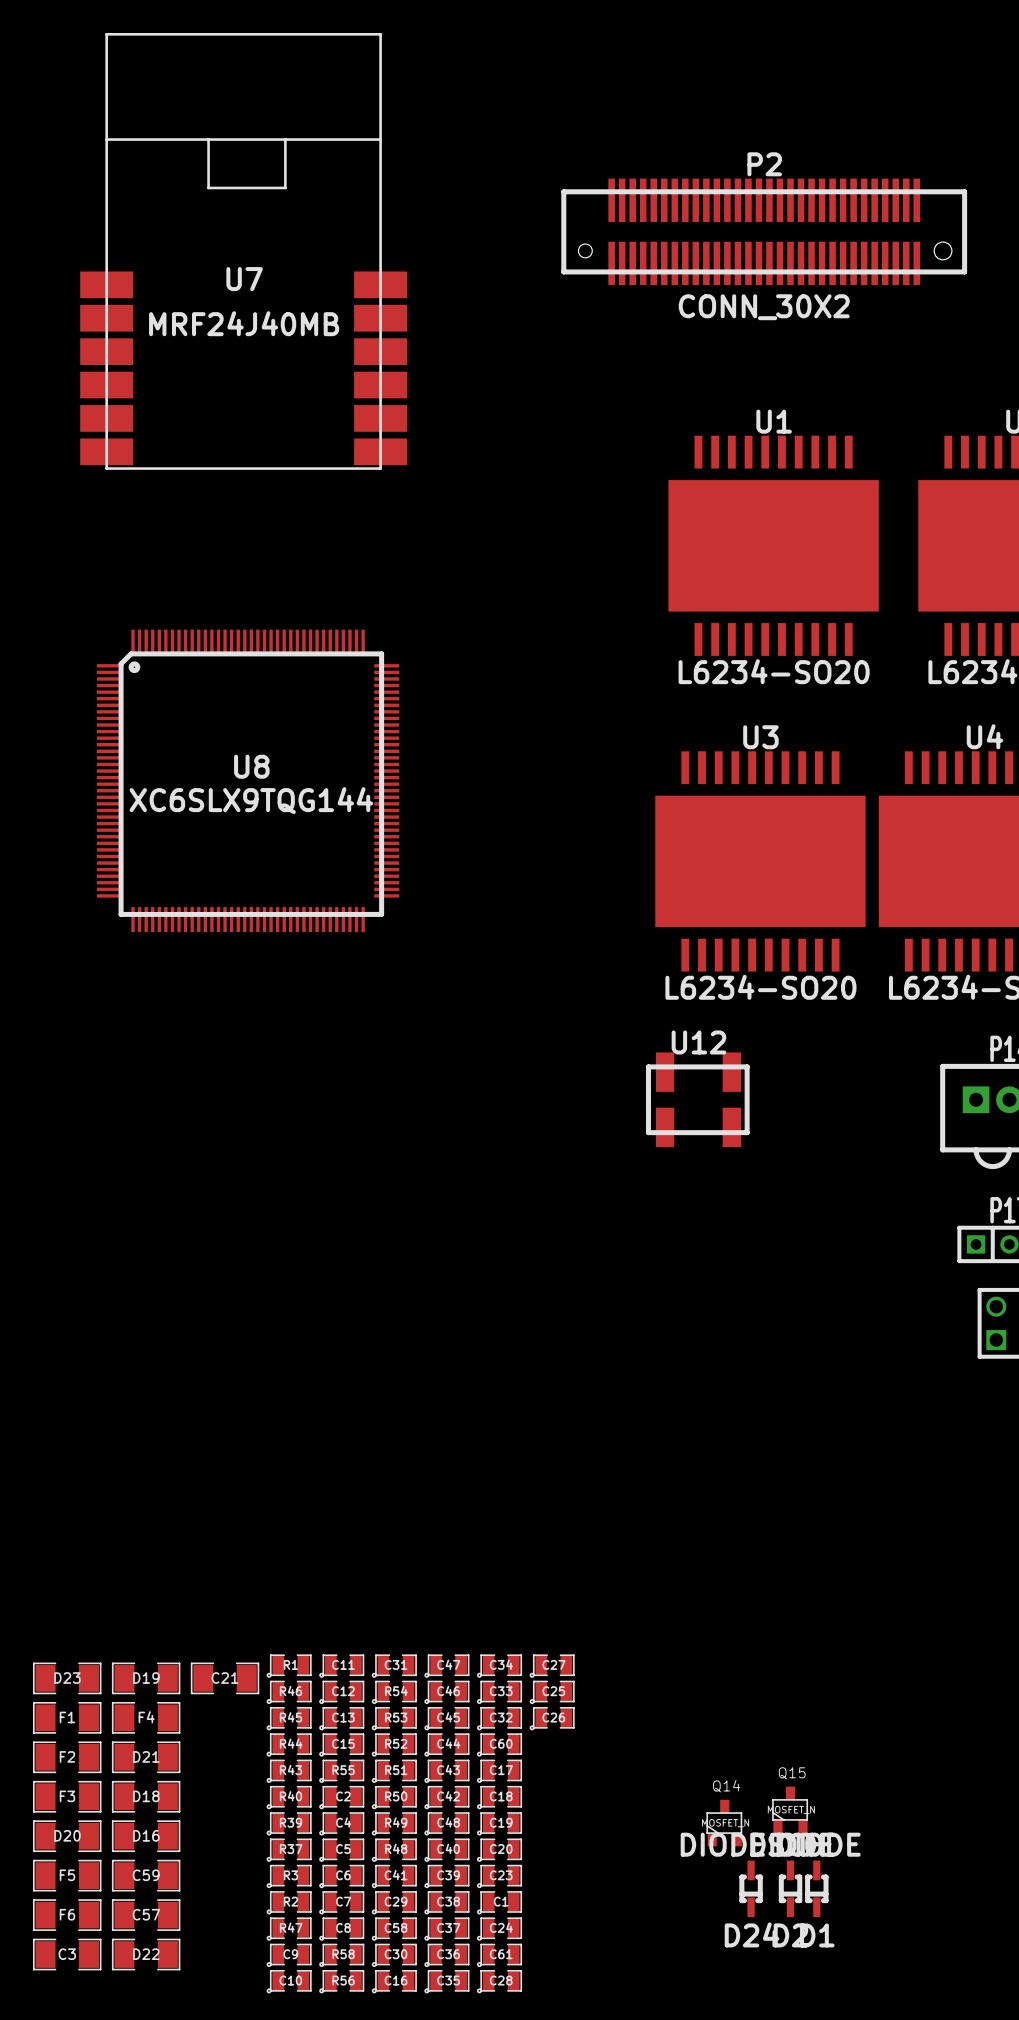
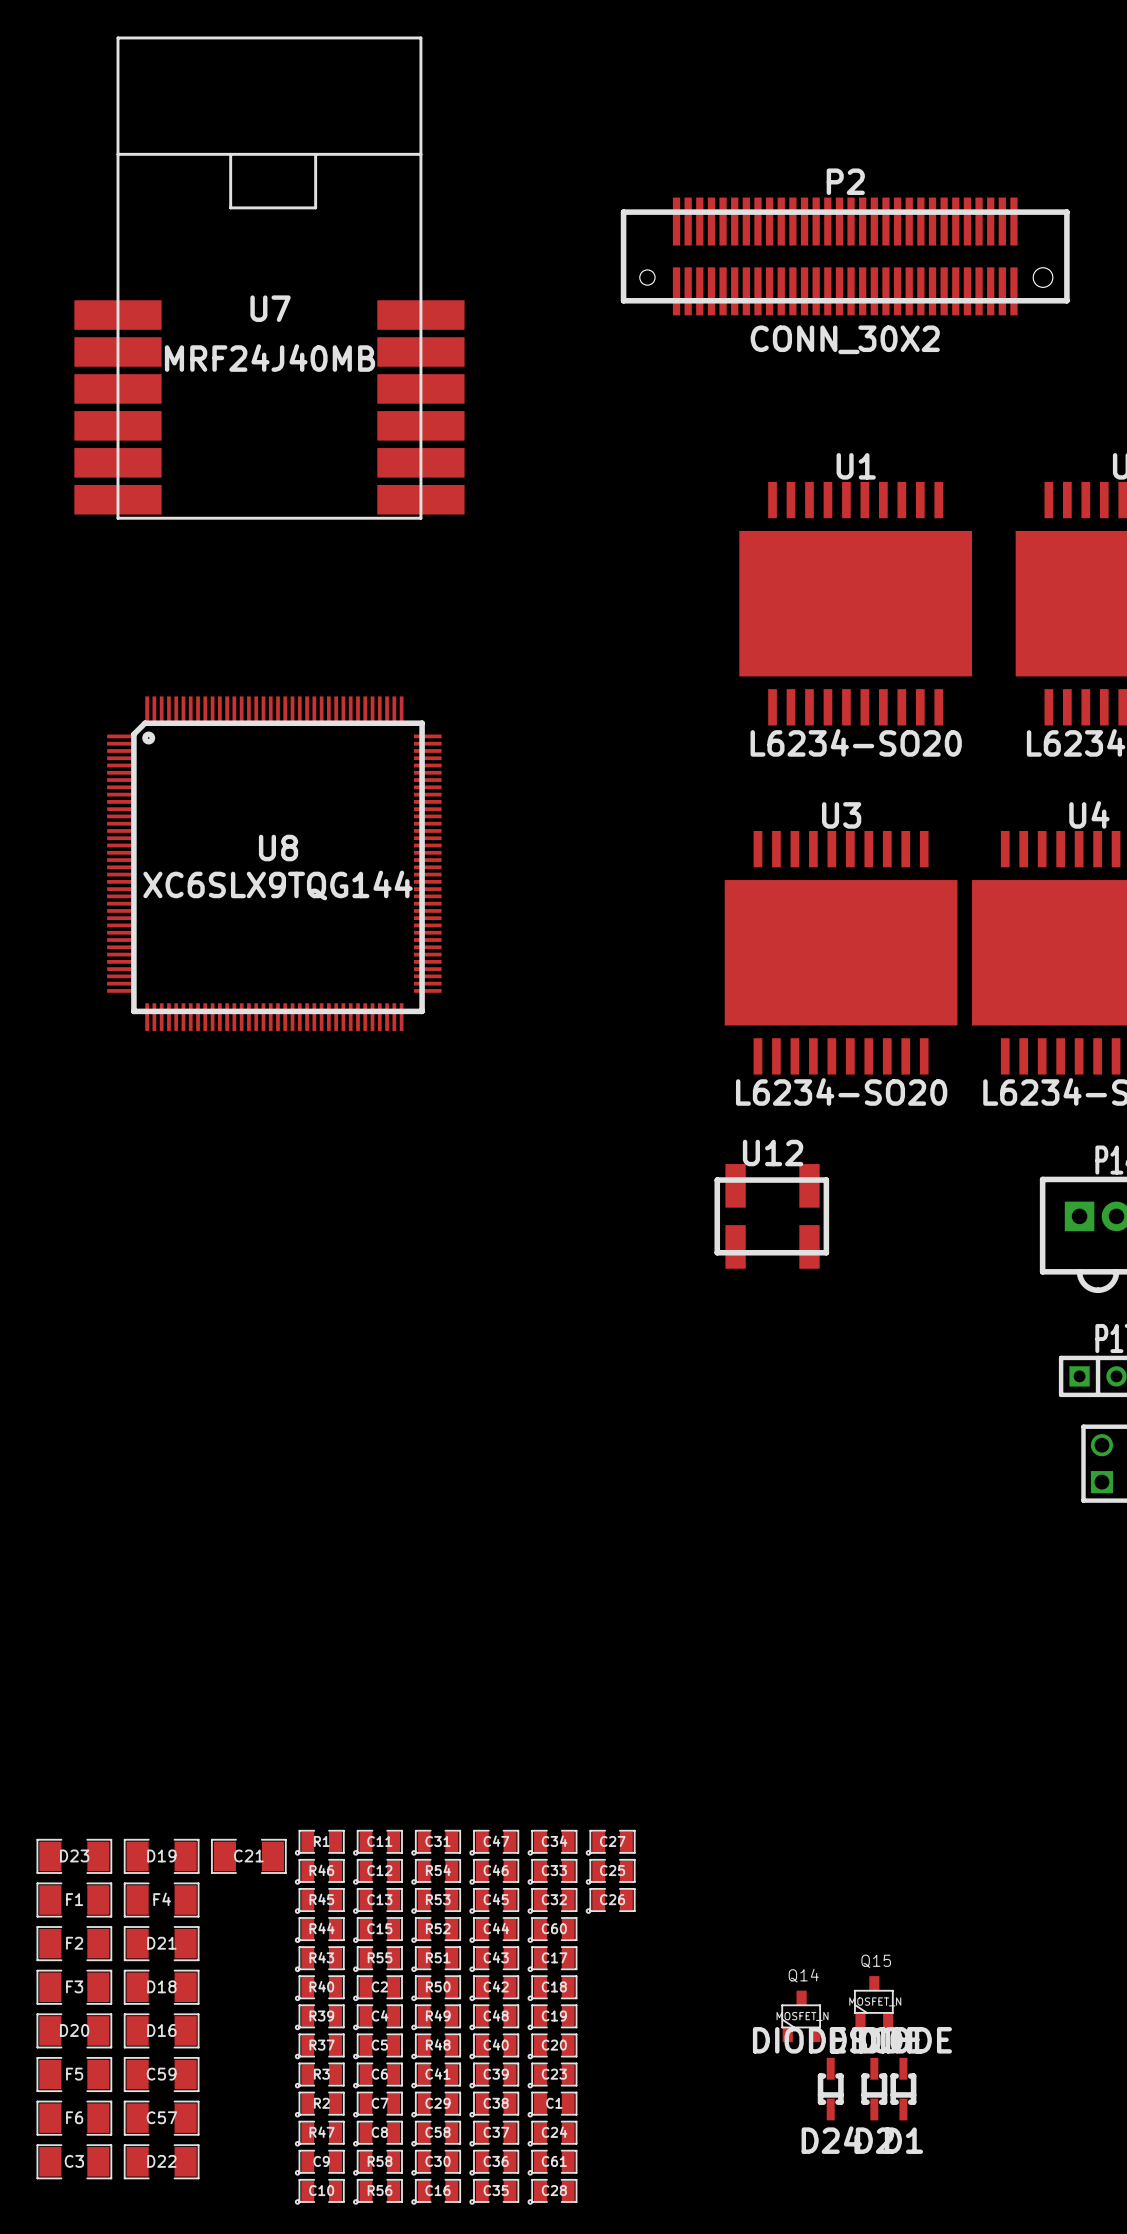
U7 footprint: [80, 33, 408, 470] -> [74, 36, 465, 520]

